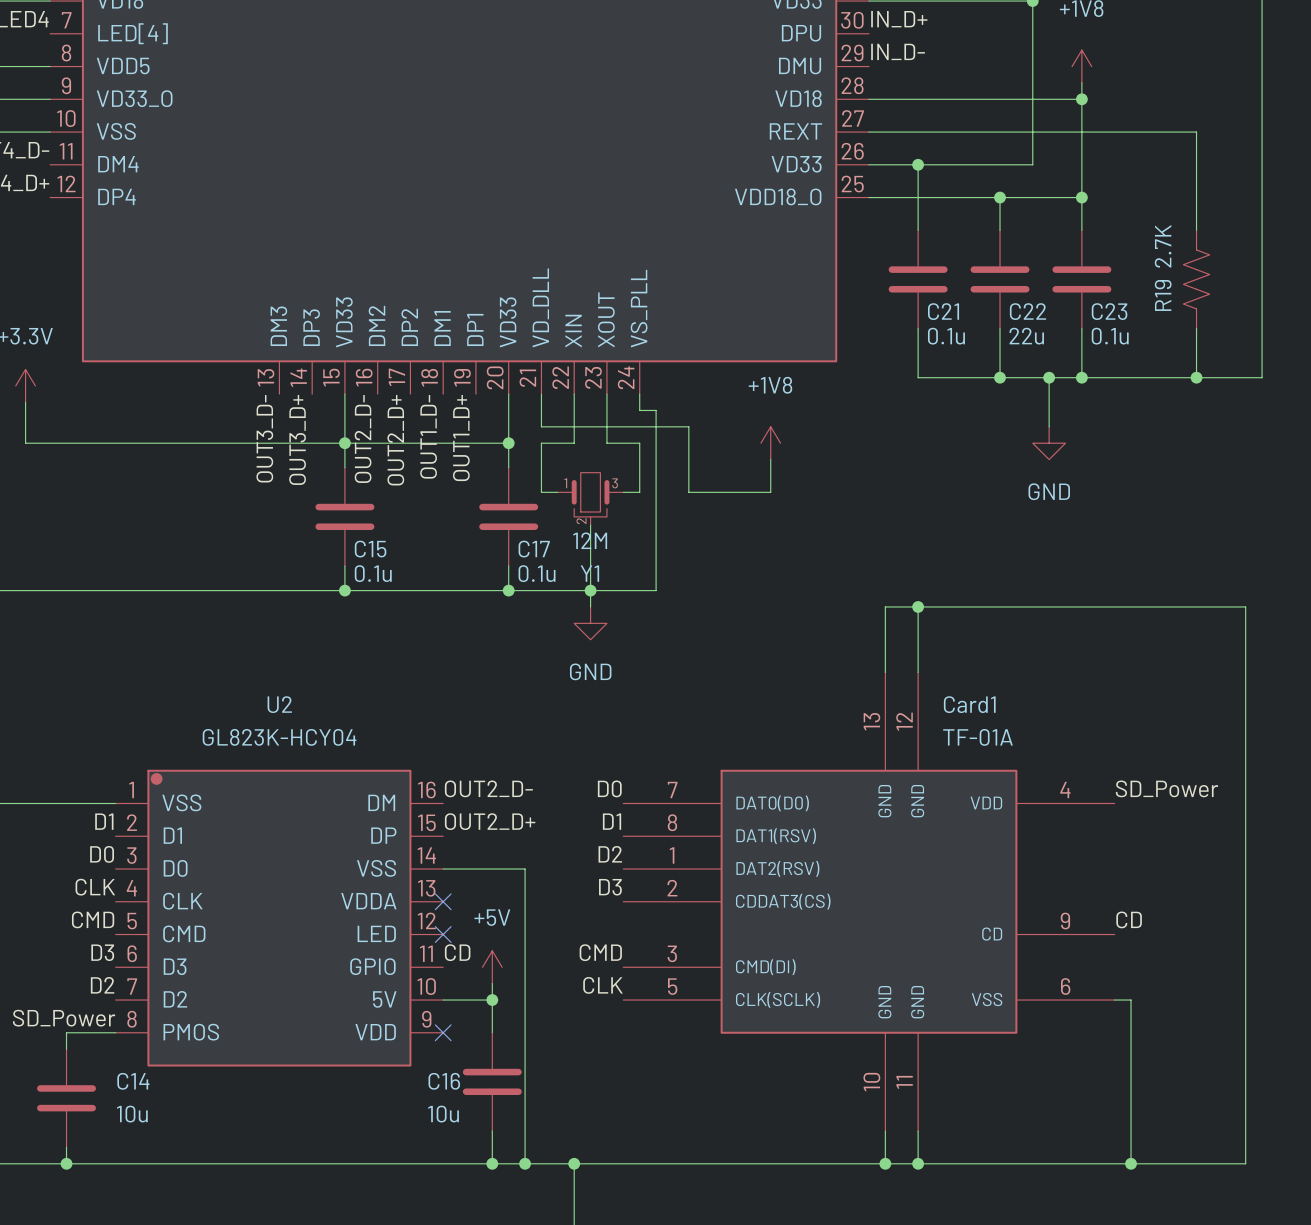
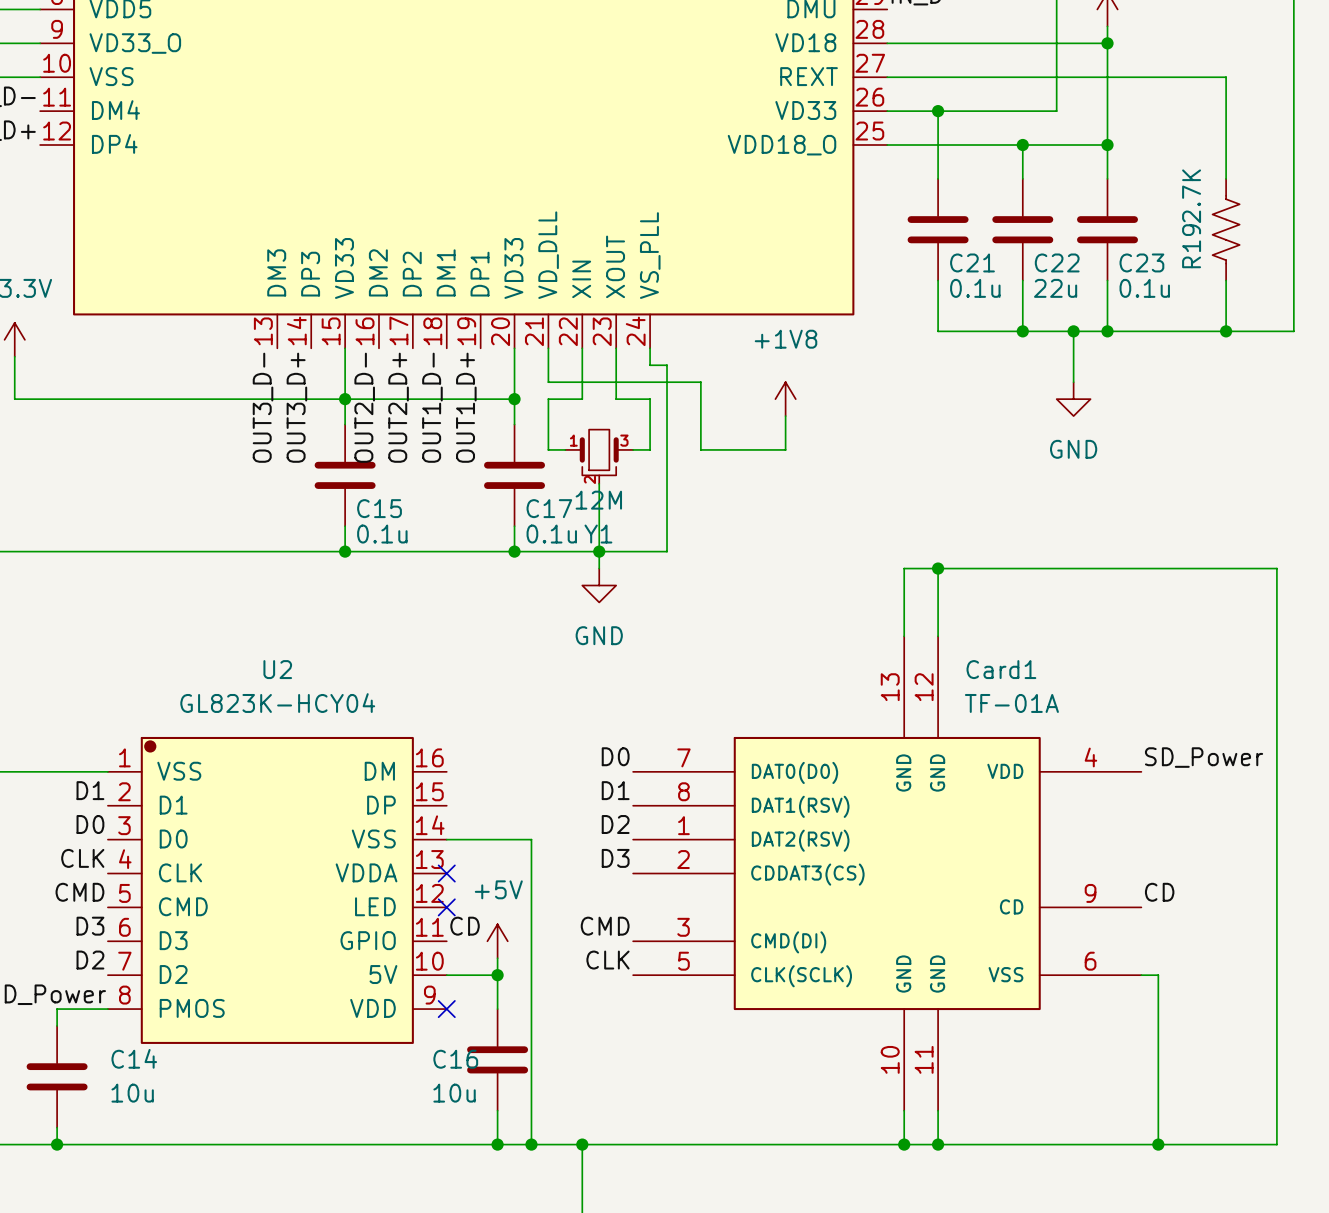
label: OUT2_D- (488, 788) -> none
label: OUT2_D+ (490, 821) -> none

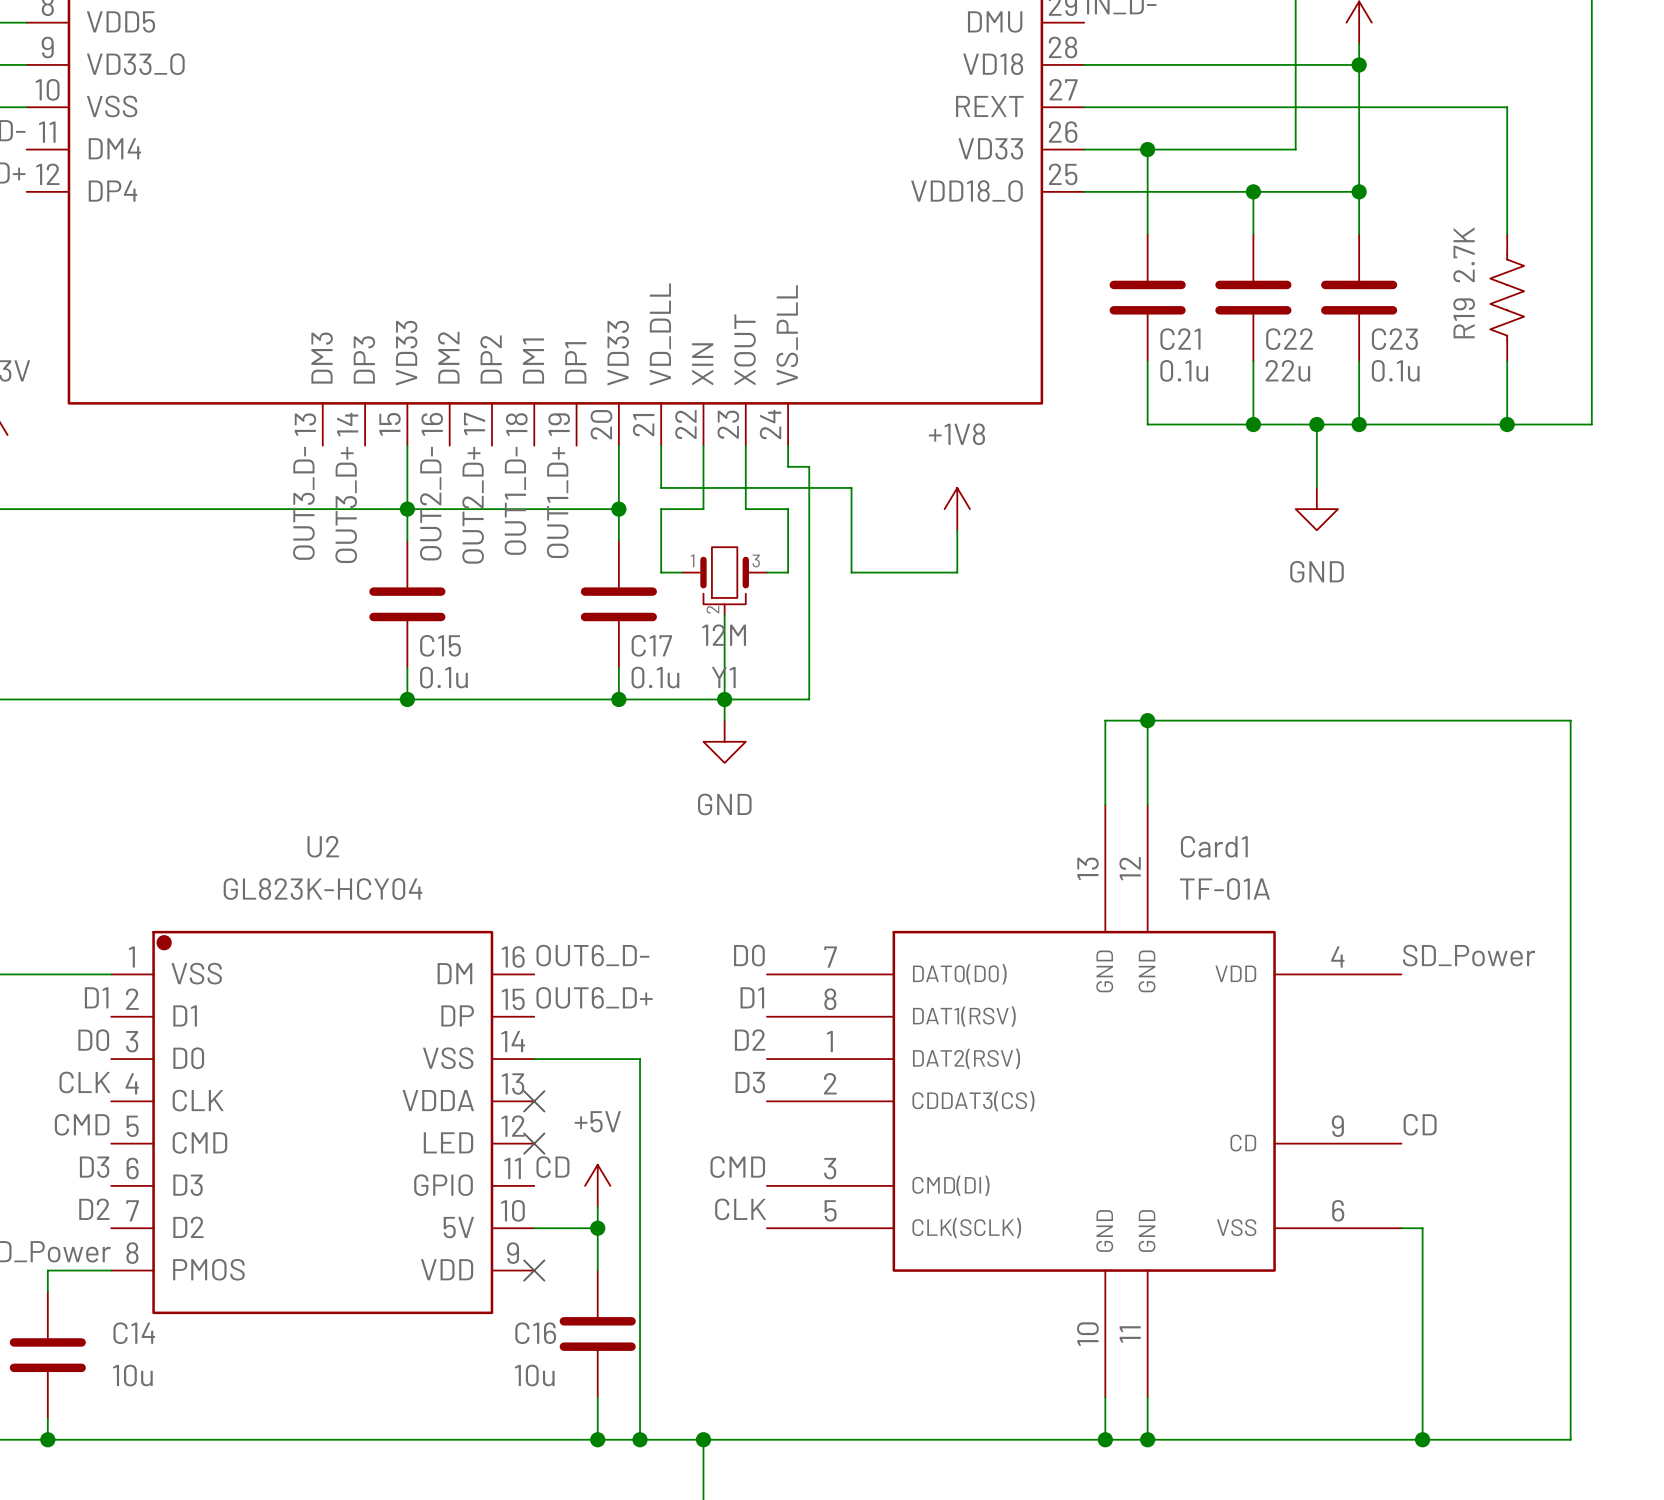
label: none -> OUT6_D- (592, 955)
label: none -> OUT6_D+ (594, 997)

